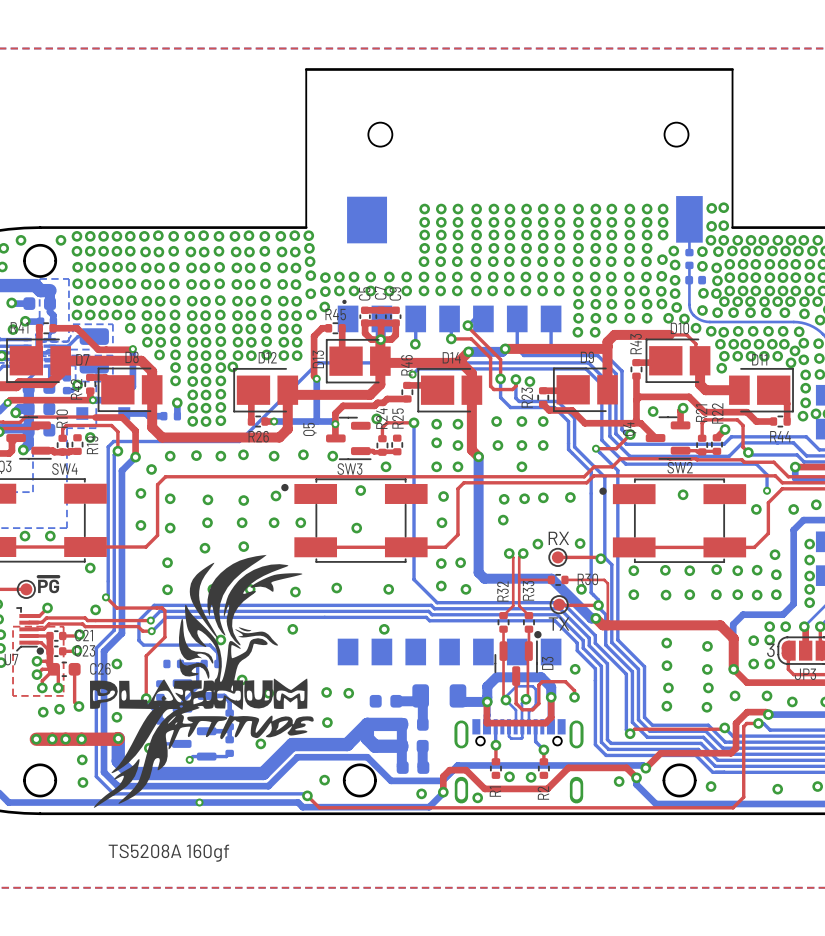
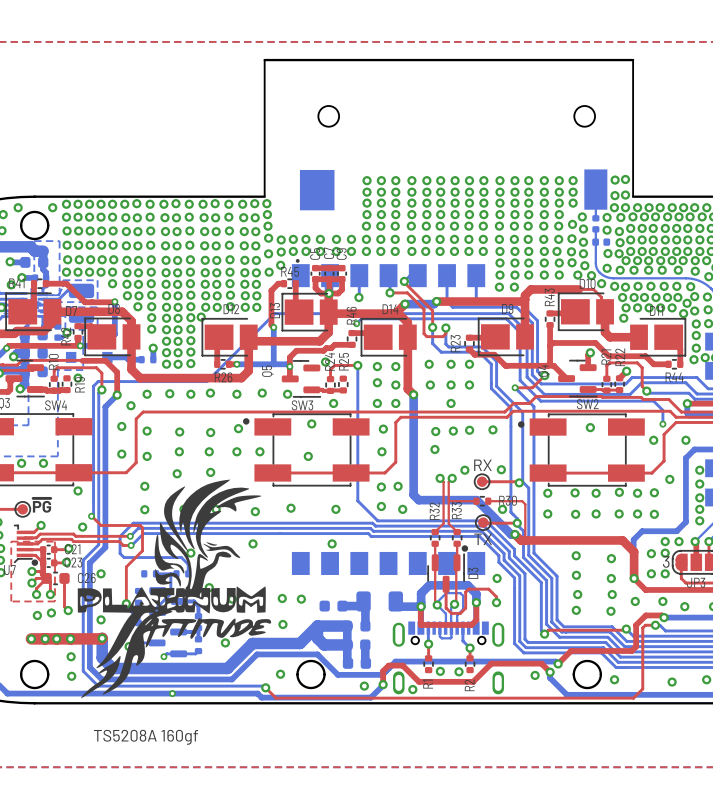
via: (529, 381) -> none
via: (653, 411) -> none
via: (816, 504) -> none
via: (776, 574) -> none
via: (776, 594) -> none

